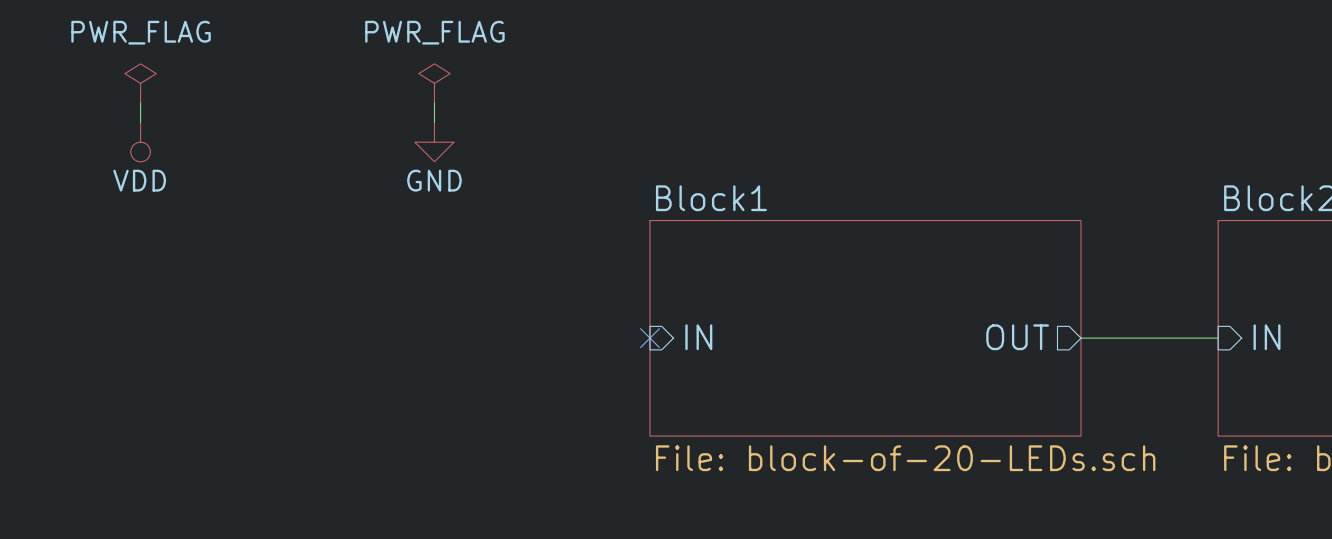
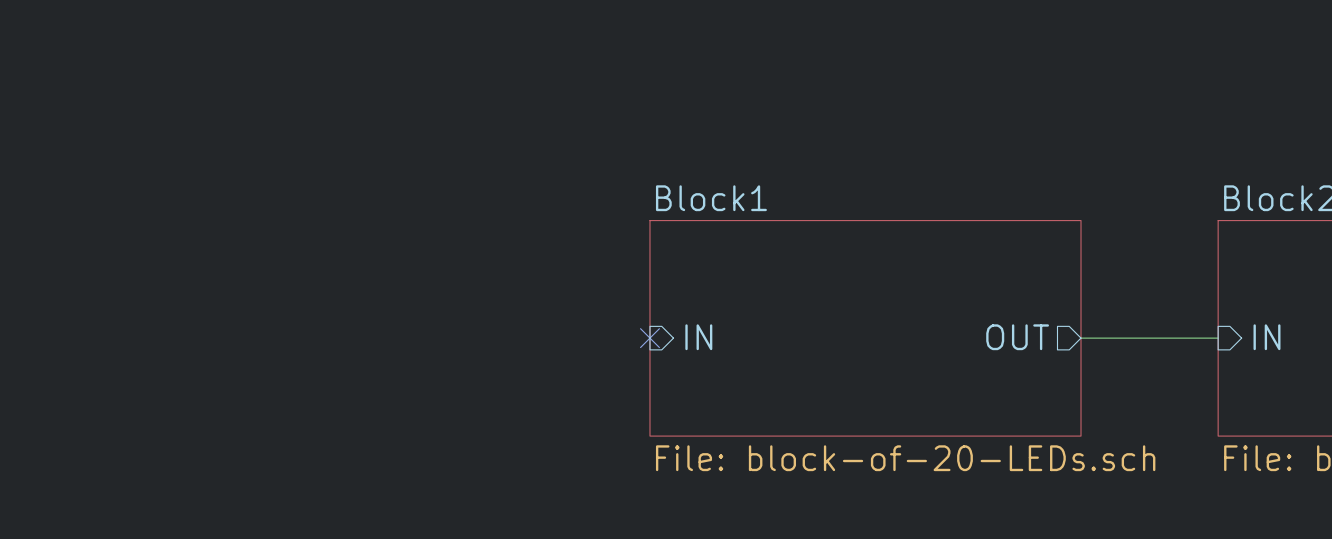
power symbol: PWR_FLAG (140, 83) -> none
power symbol: PWR_FLAG (434, 83) -> none
wire: (140, 103) (140, 122) -> none
wire: (434, 103) (434, 122) -> none
power symbol: VDD (140, 142) -> none
power symbol: GND (434, 142) -> none

